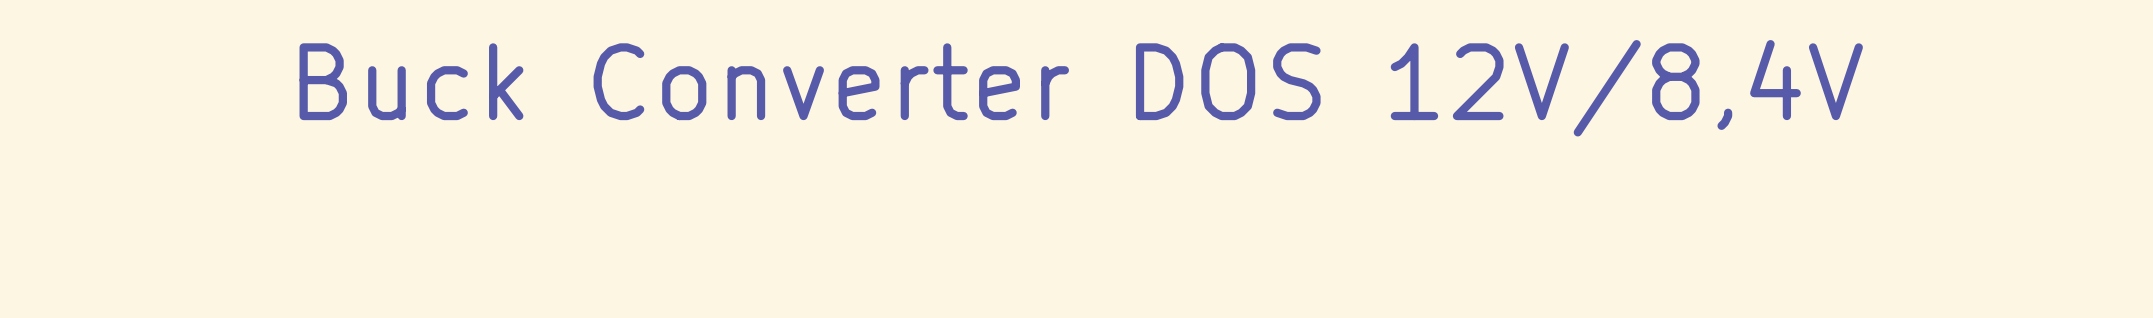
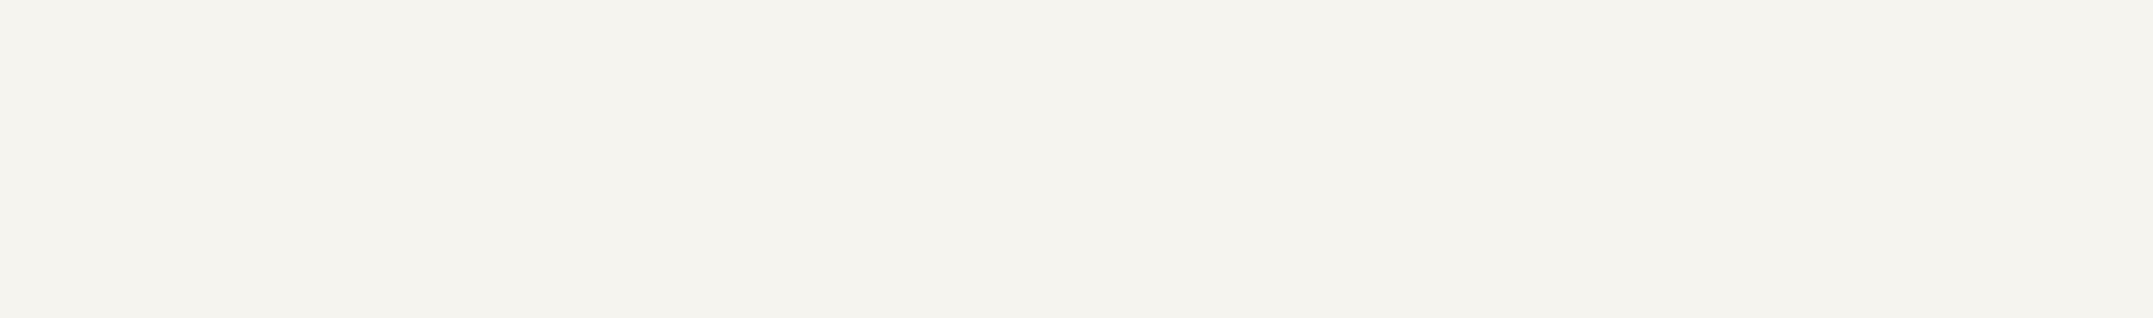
text: Buck Converter DOS 12V/8,4V (1081, 88) -> none

